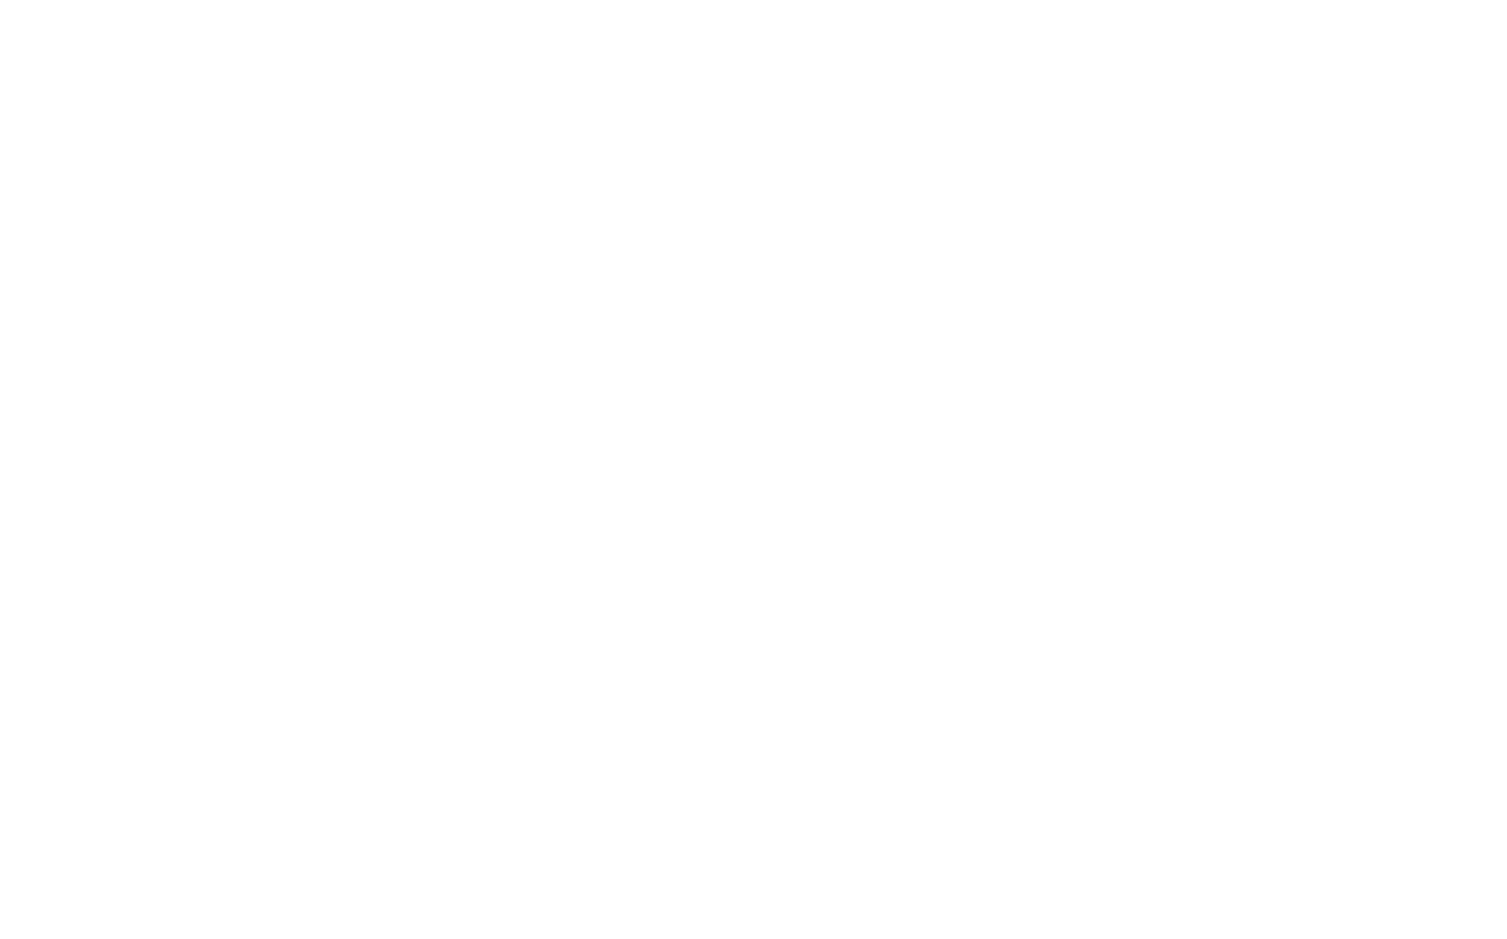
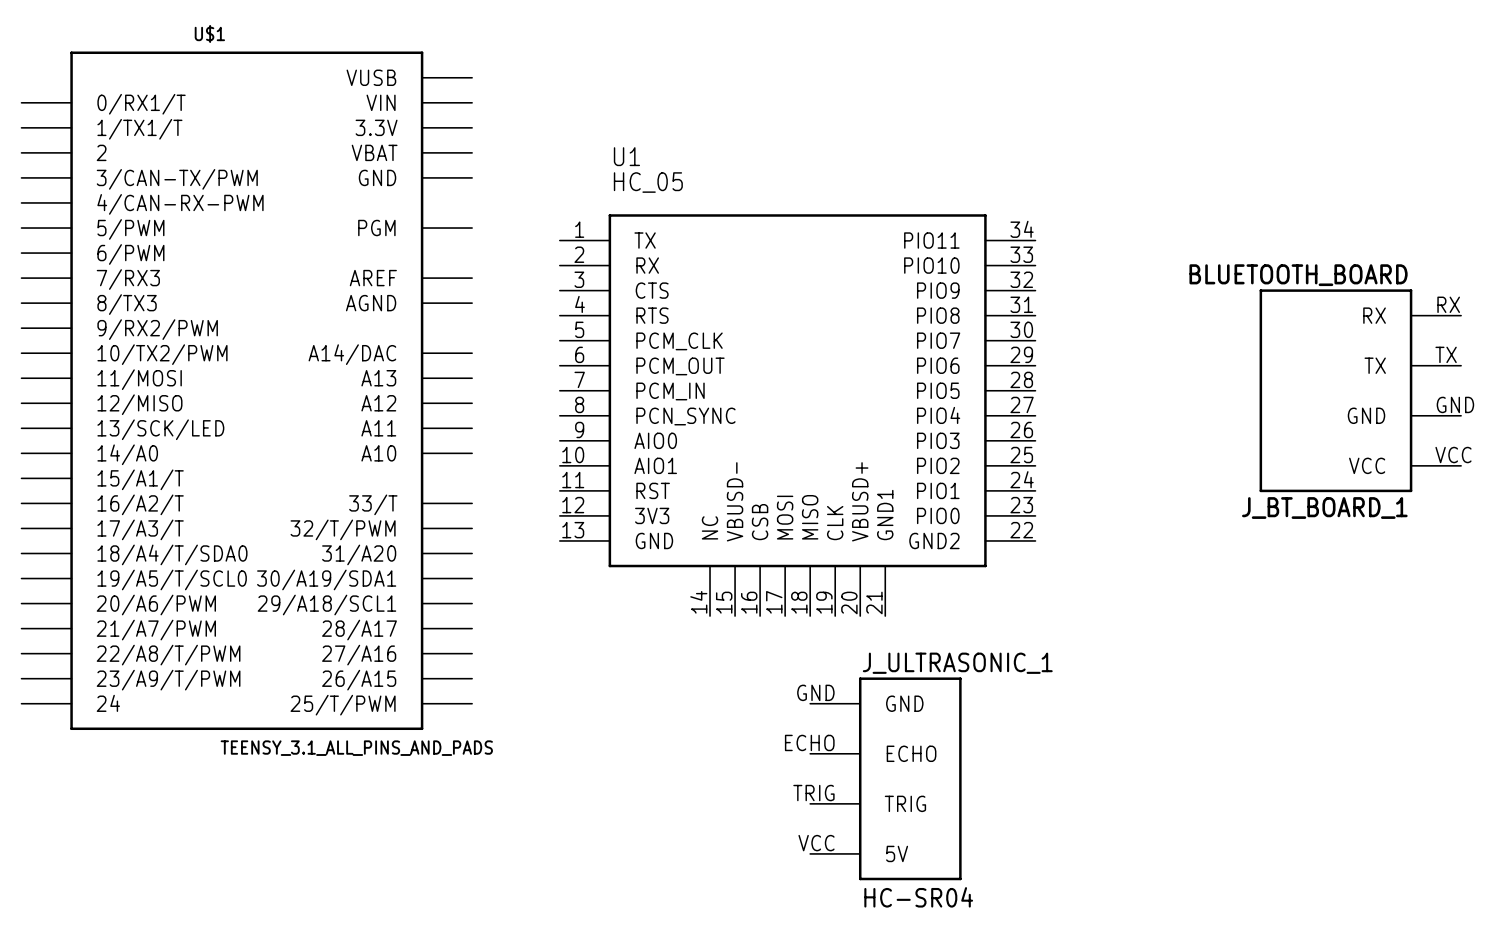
U$1: none -> TEENSY_3.1_ALL_PINS_AND_PADS (246, 390)
J_BT_BOARD_1: none -> BLUETOOTH_BOARD (1360, 390)
U1: none -> HC_05 (797, 415)
J_ULTRASONIC_1: none -> HC-SR04 (885, 778)

